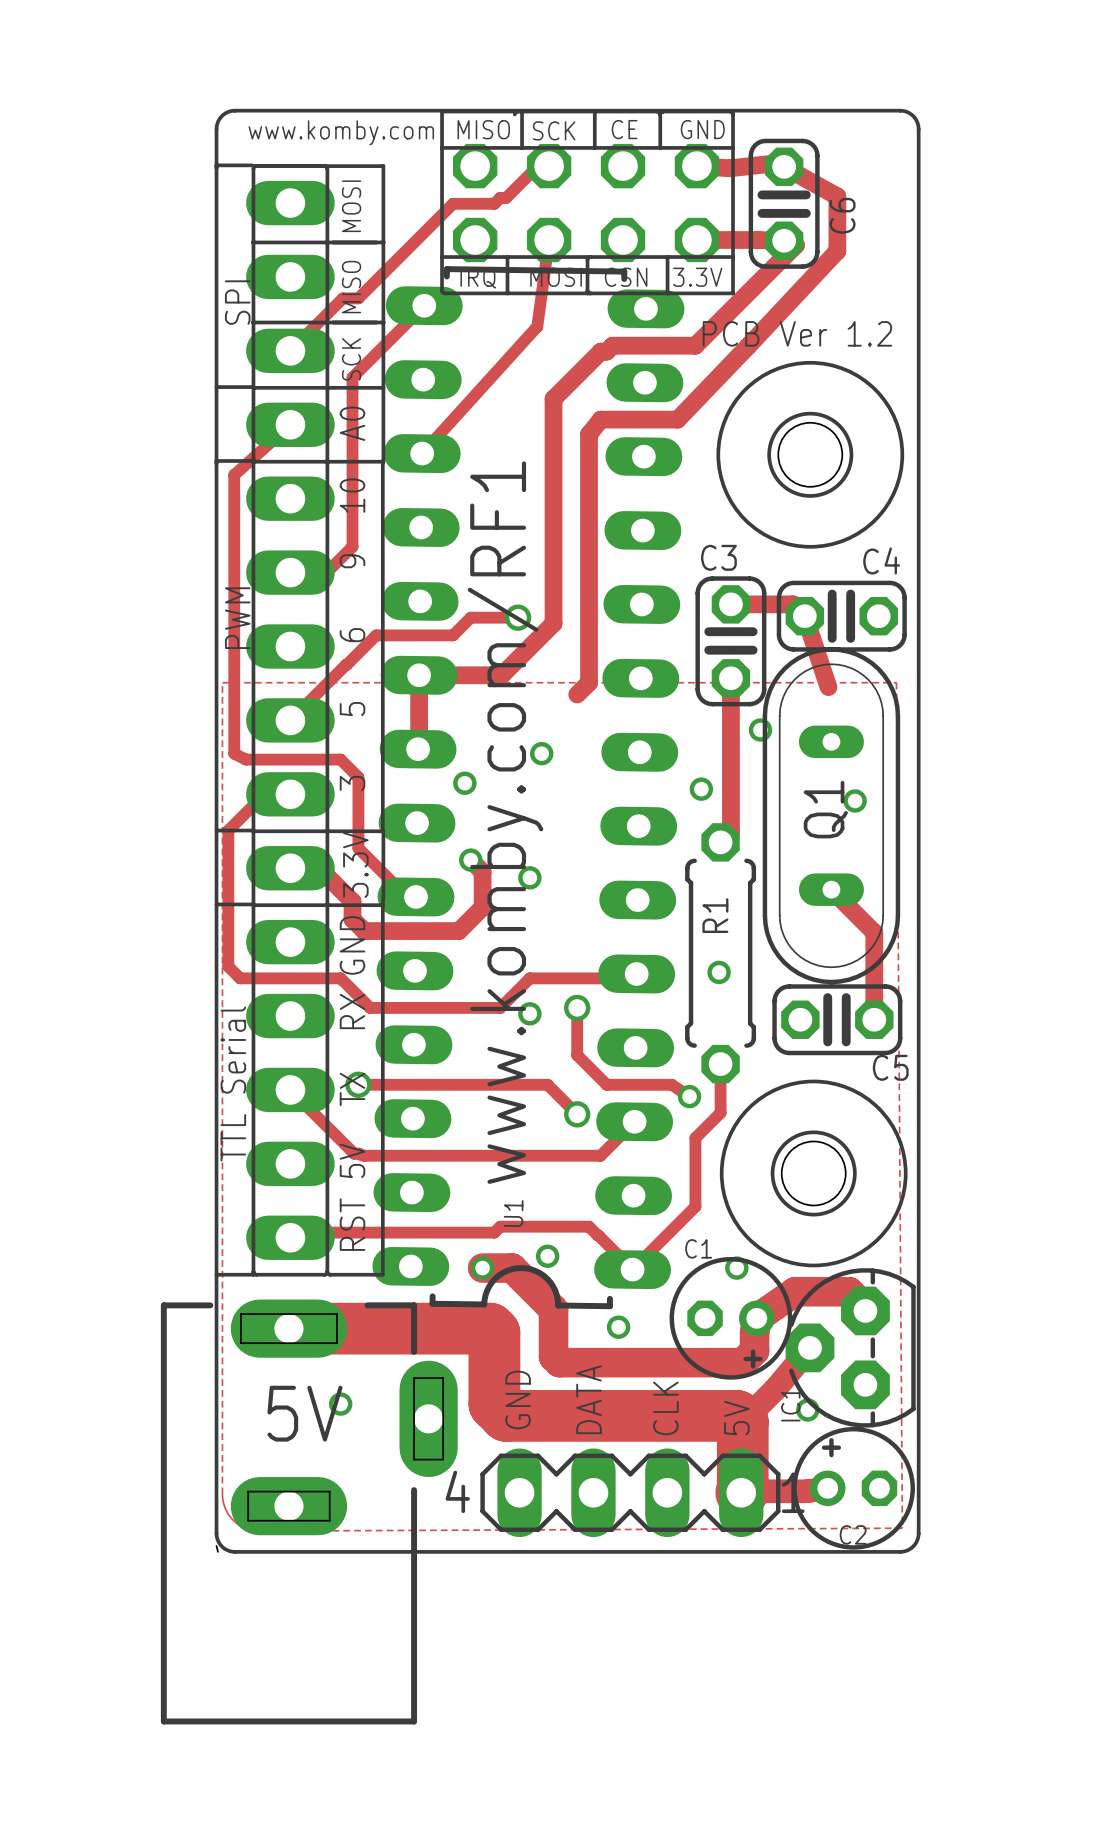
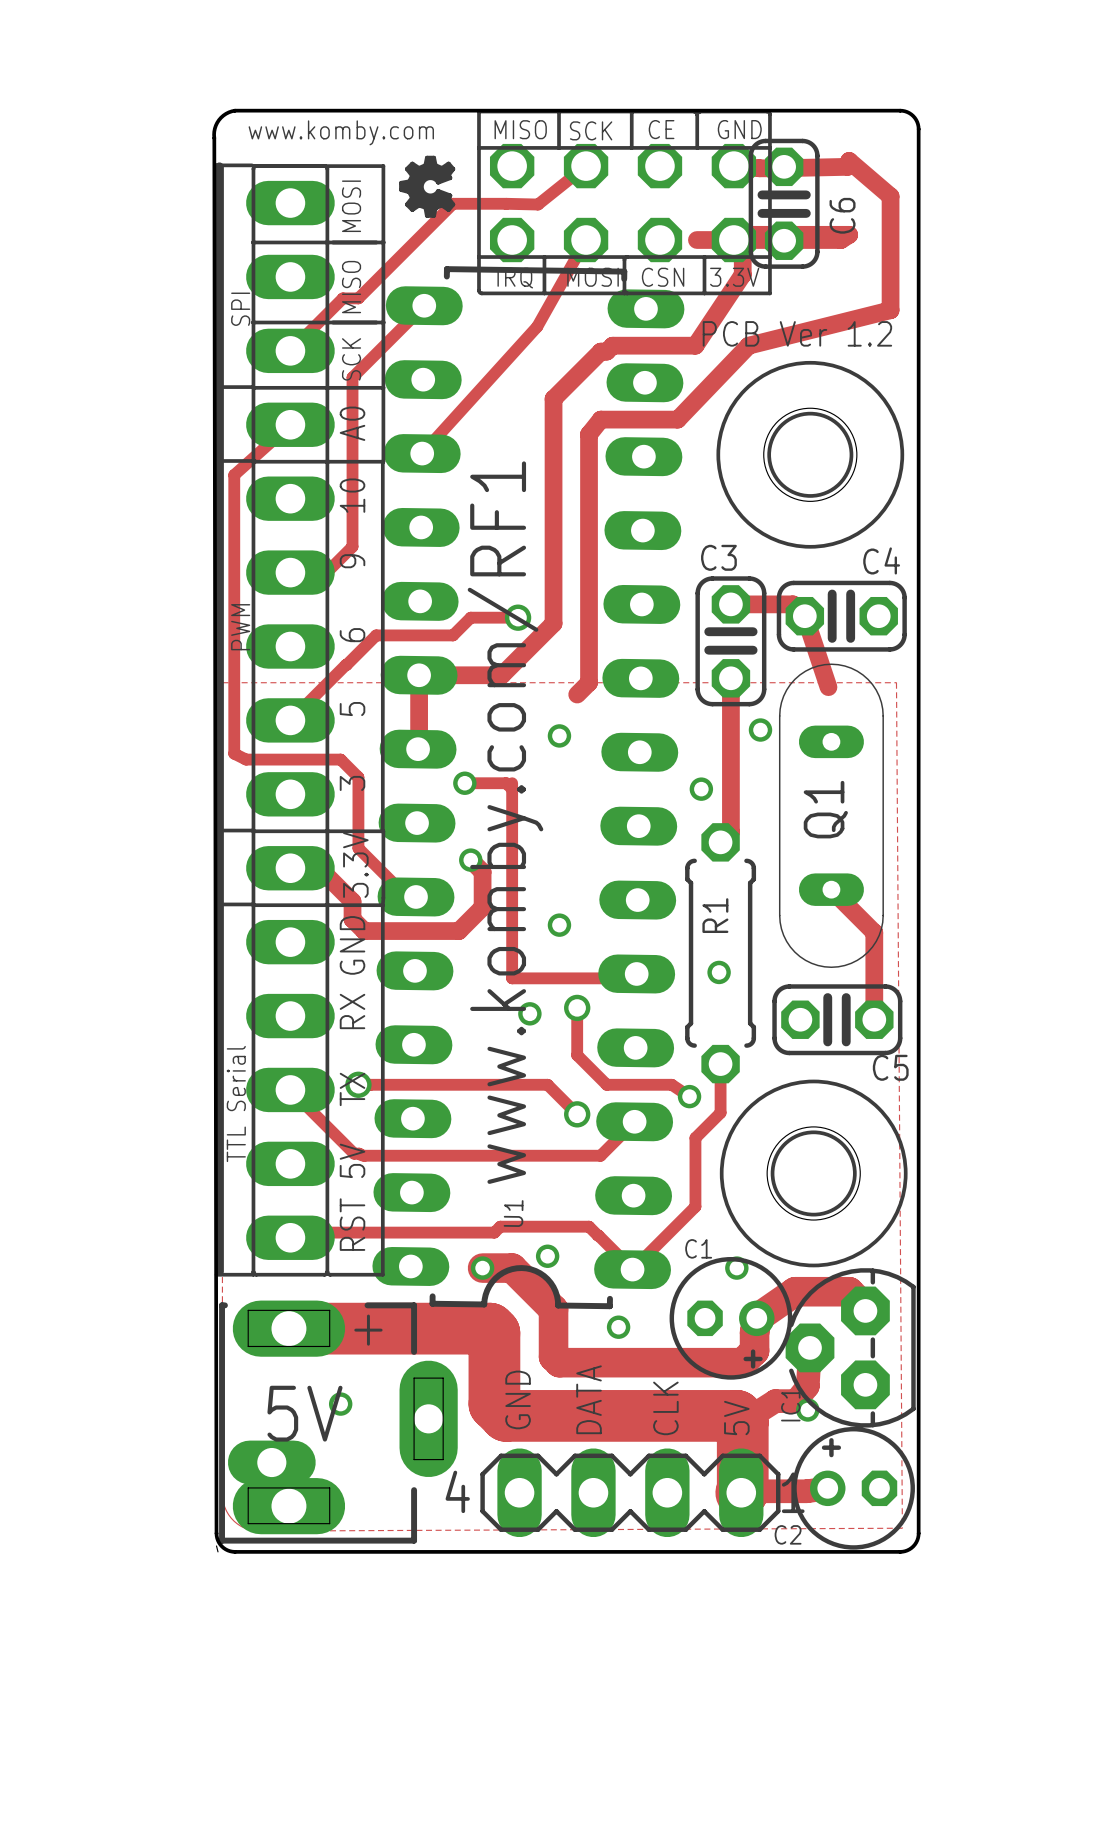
part footprint: [214, 108, 921, 1554] -> [212, 108, 921, 1554]
drawing: none -> [399, 155, 456, 218]
track: (549, 166) (538, 166) (506, 197) (500, 197) (494, 203) -> (586, 166) (538, 204) (494, 203)
track: (696, 166) (730, 168) (784, 162) (784, 166) (837, 196) (837, 251) (748, 345) -> (733, 166) (759, 168) (847, 166) (849, 160) (890, 196) (890, 310) (748, 345)
track: (549, 240) (537, 326) -> (586, 240) (537, 326)
track: (758, 240) (790, 240) (795, 245) (695, 345) -> (758, 240) (841, 240) (849, 234) (742, 234) (742, 274) (695, 345)
Q1 footprint: [762, 647, 901, 985] -> [778, 663, 884, 969]
via position: (541, 753) -> (559, 735)
track: none -> (470, 783) (506, 783) (512, 789)
track: (290, 794) (264, 794) (228, 830) (228, 966) (240, 978) (340, 978) (370, 1007) (500, 1007) (529, 978) -> (512, 783) (512, 978) (529, 978)
via: (855, 800) -> none
via position: (529, 877) -> (559, 925)
track: (810, 1347) (775, 1389) (742, 1421) -> (810, 1347) (807, 1386) (795, 1401) (775, 1401) (742, 1421)
part: none -> (338, 1422)
part: (309, 1511) -> none
C2 name position: C2 (853, 1534) -> C2 (788, 1534)

